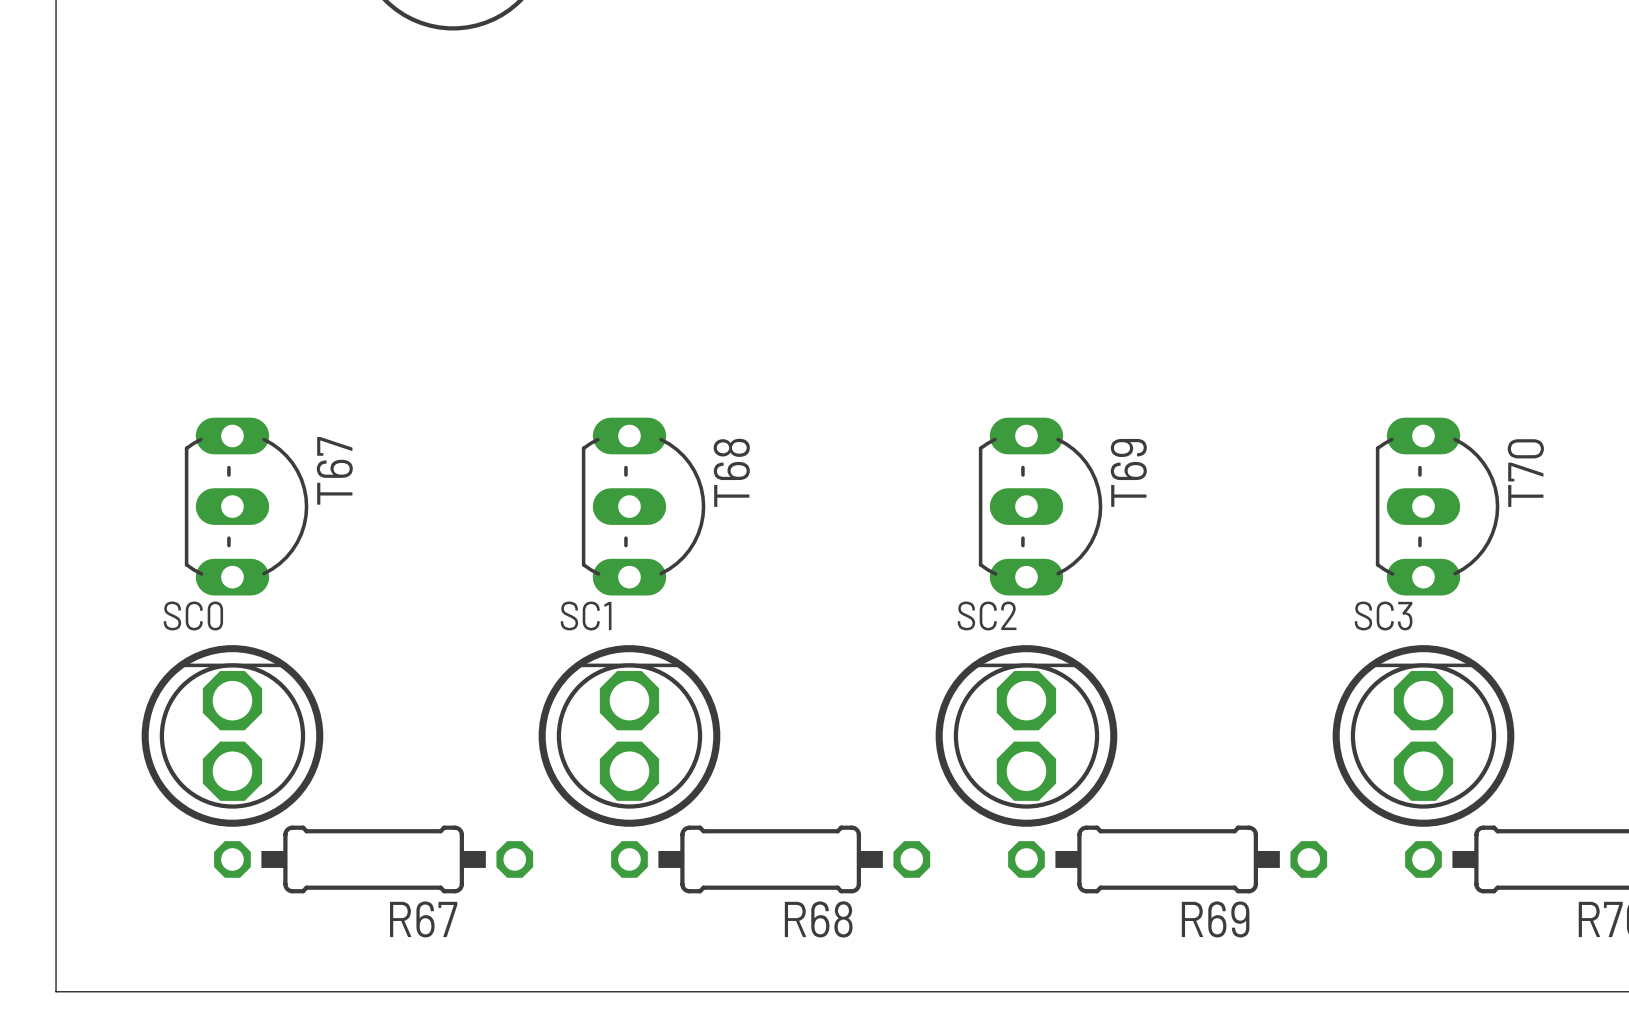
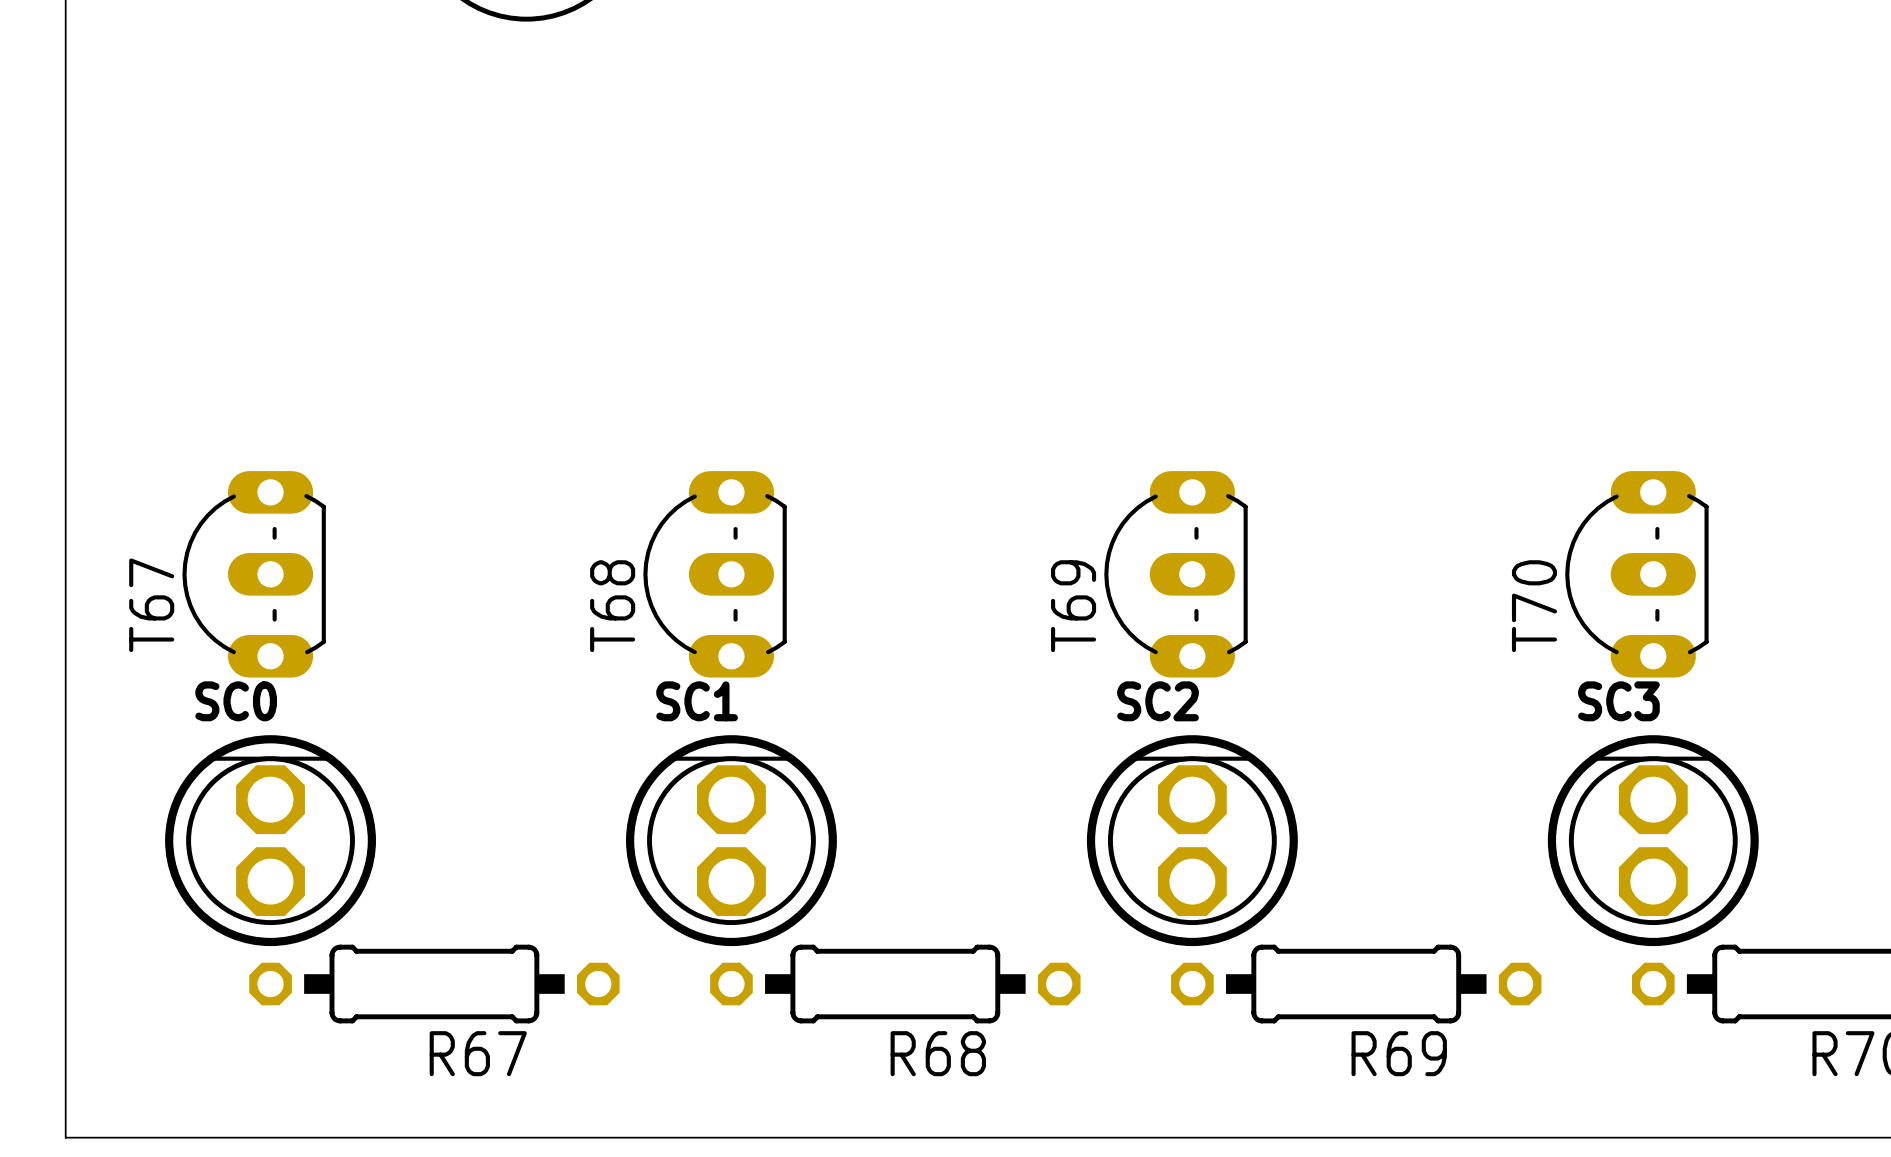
T67 rotation: 0° (246, 506) -> 180° (254, 574)
T68 rotation: 0° (643, 506) -> 180° (715, 574)
T69 rotation: 0° (1040, 506) -> 180° (1175, 574)
T70 rotation: 0° (1437, 506) -> 180° (1636, 574)

